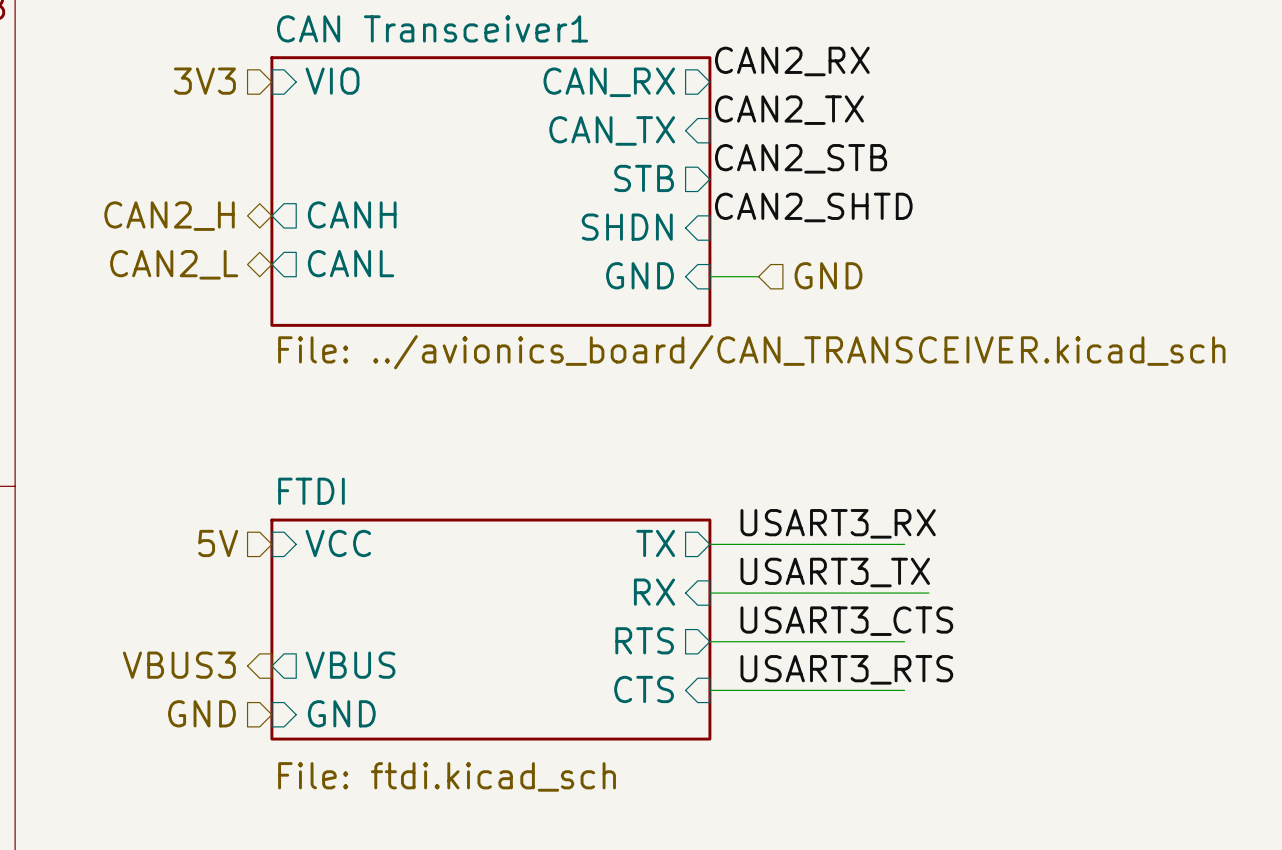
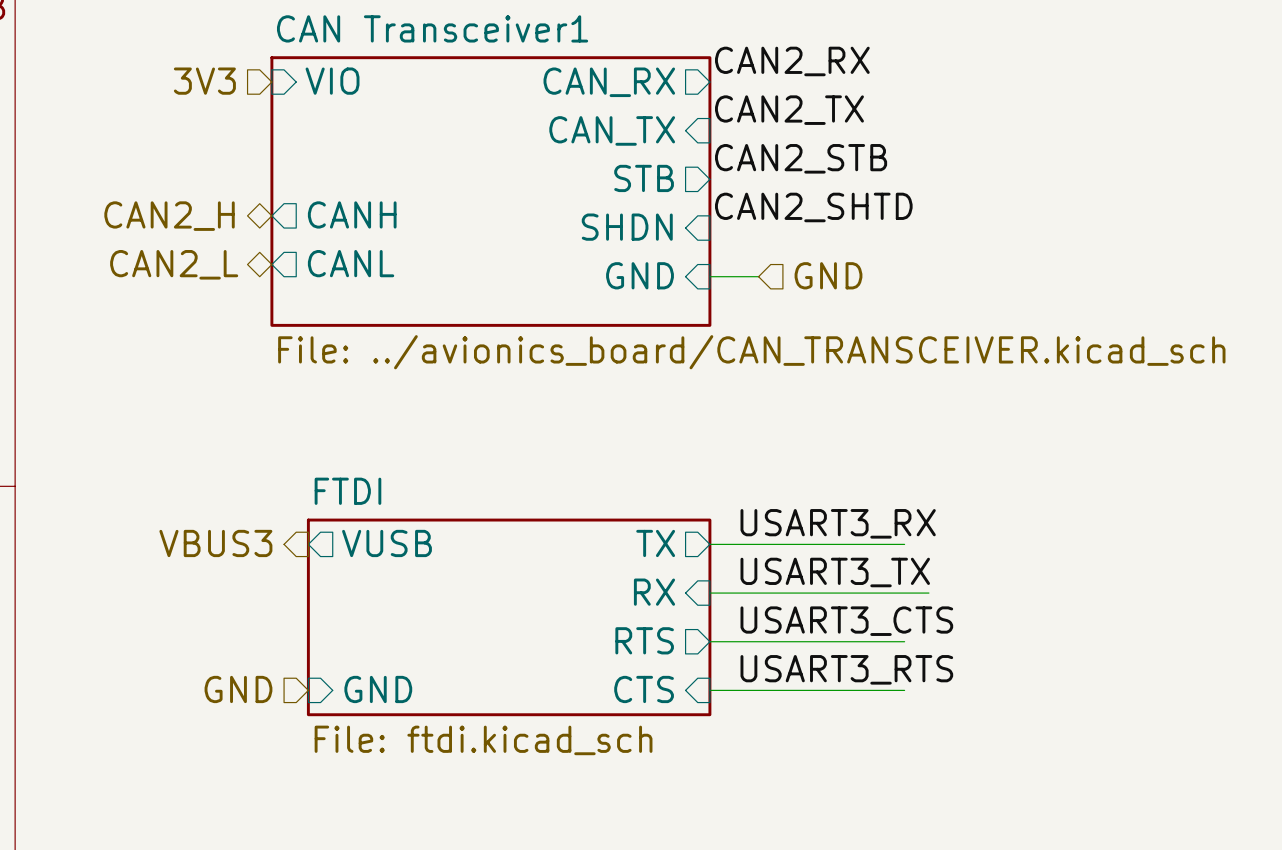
hierarchical label: 5V (218, 543) -> none
sheet pin: VCC (338, 543) -> none
sheet pin: none -> VUSB (386, 543)
sheet FTDI: none -> File: ftdi.kicad_sch (509, 617)
sheet FTDI: File: ftdi.kicad_sch (490, 629) -> none
hierarchical label position: VBUS3 (179, 665) -> VBUS3 (215, 543)
sheet pin: VBUS (350, 665) -> none
hierarchical label position: GND (201, 713) -> GND (238, 689)
sheet pin position: GND (341, 713) -> GND (378, 689)

